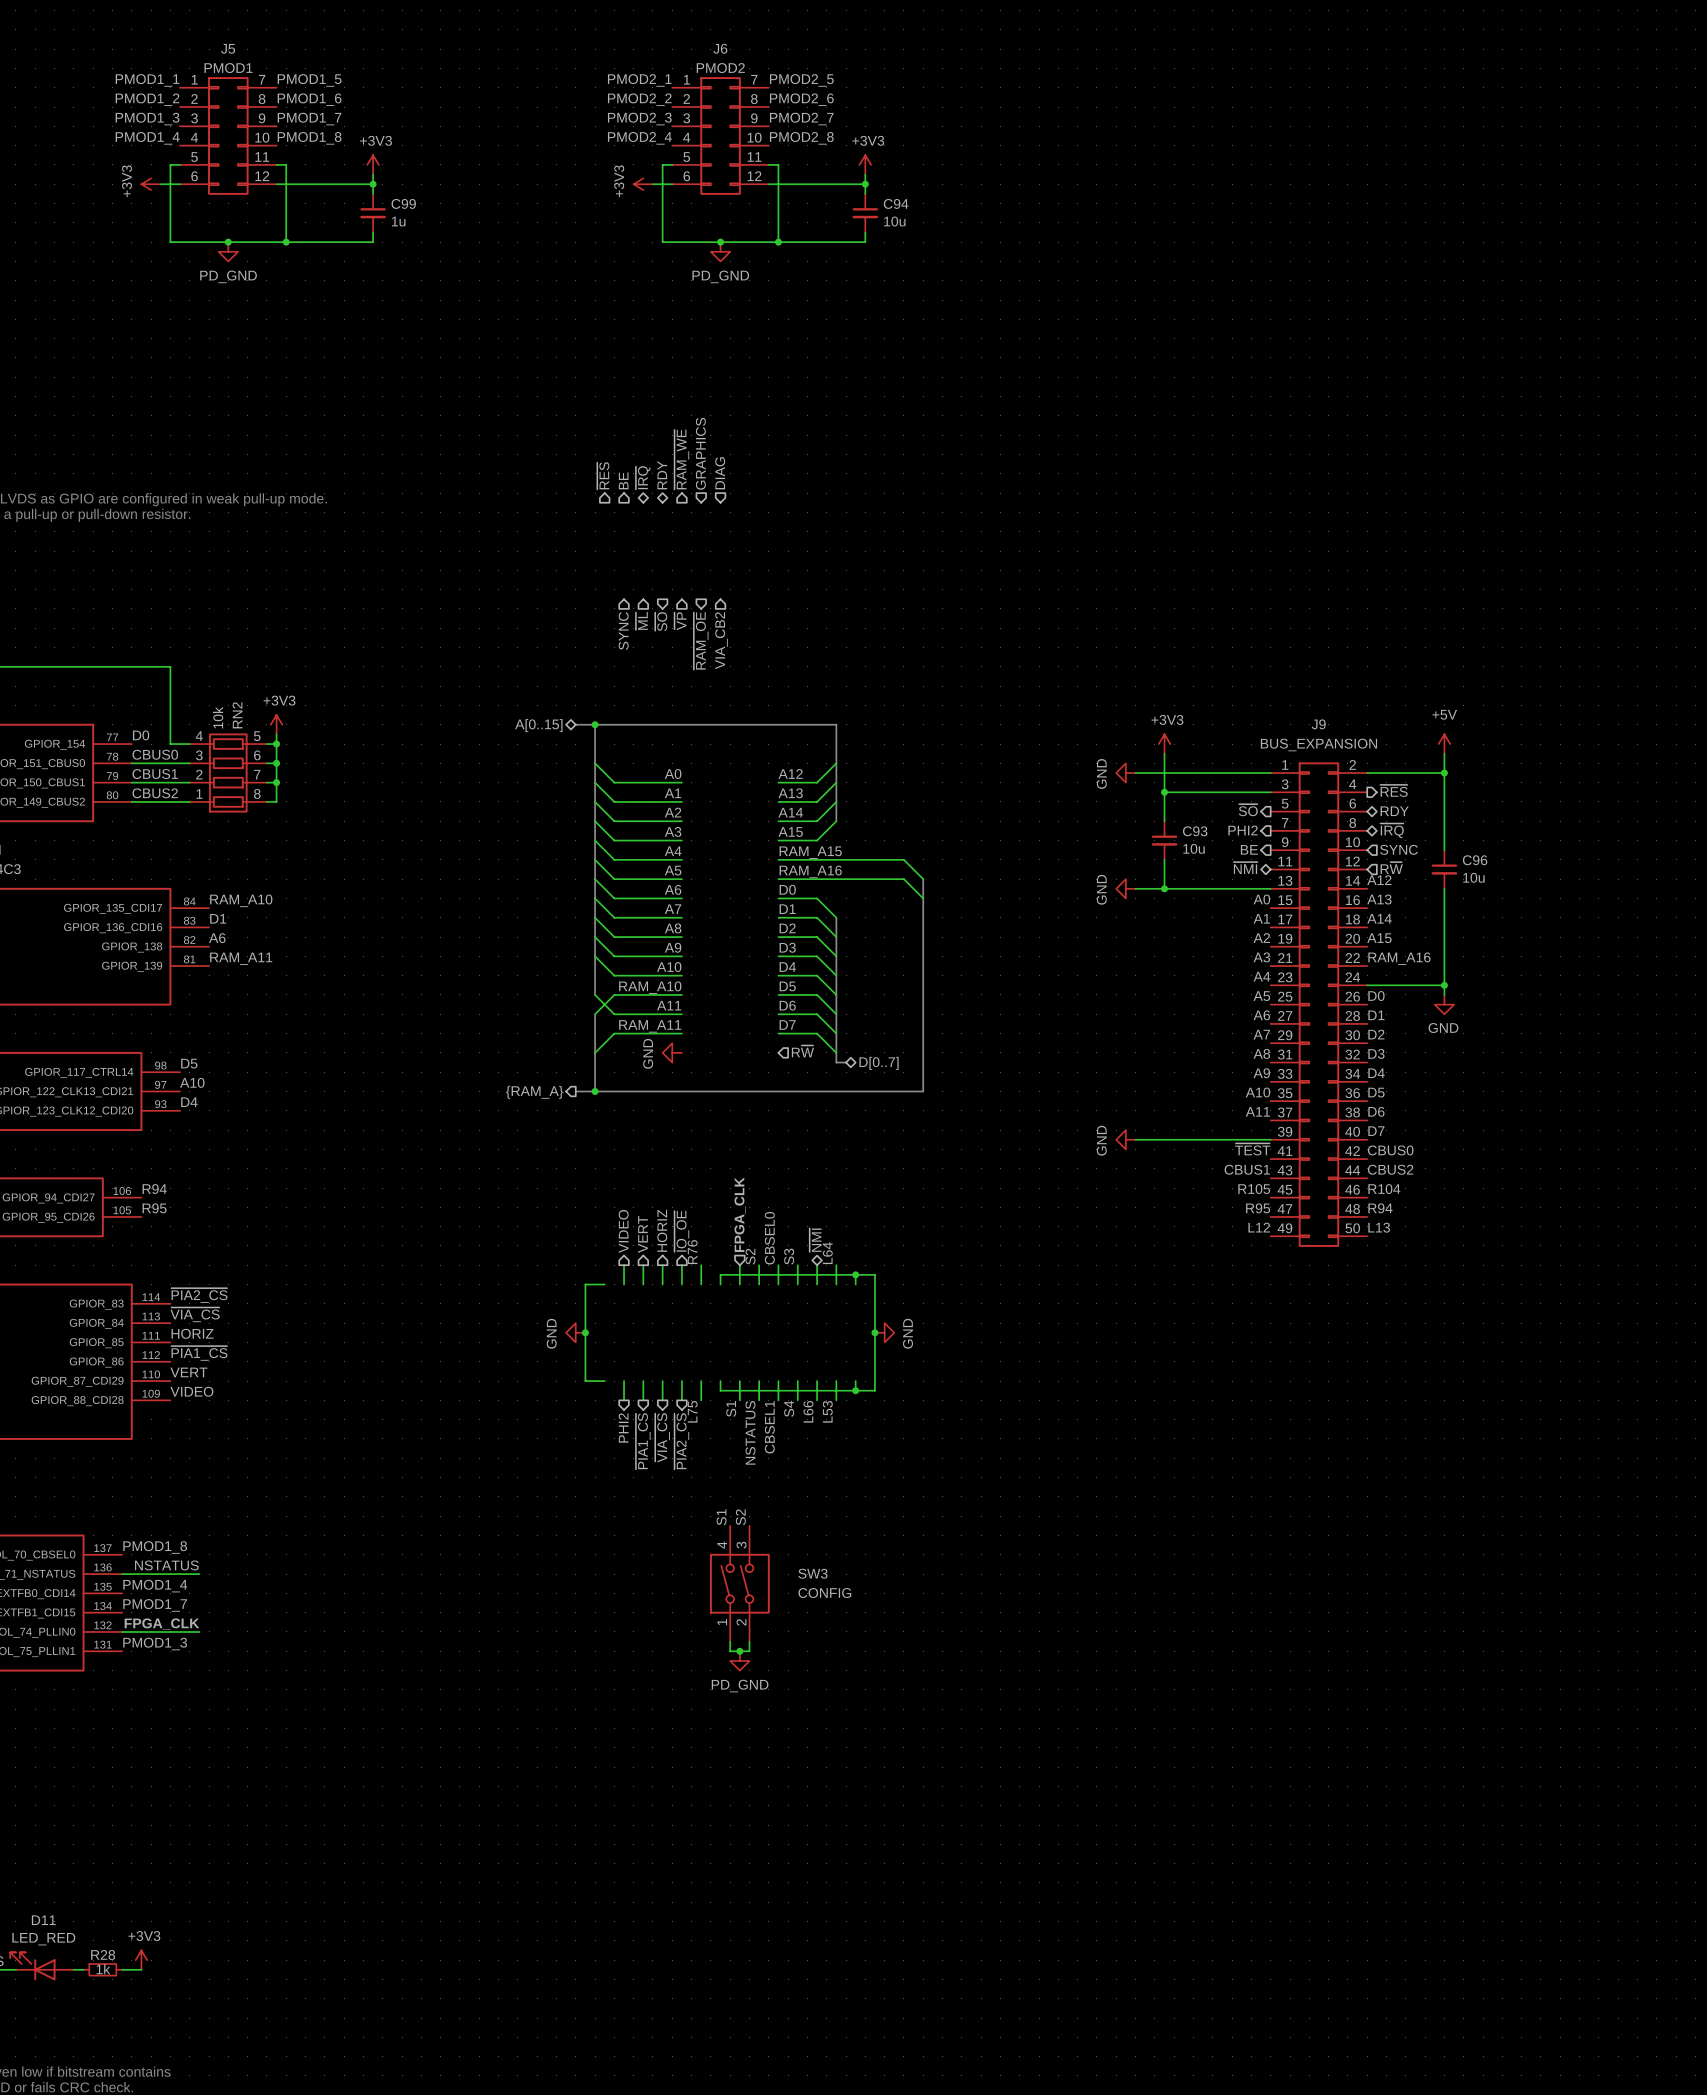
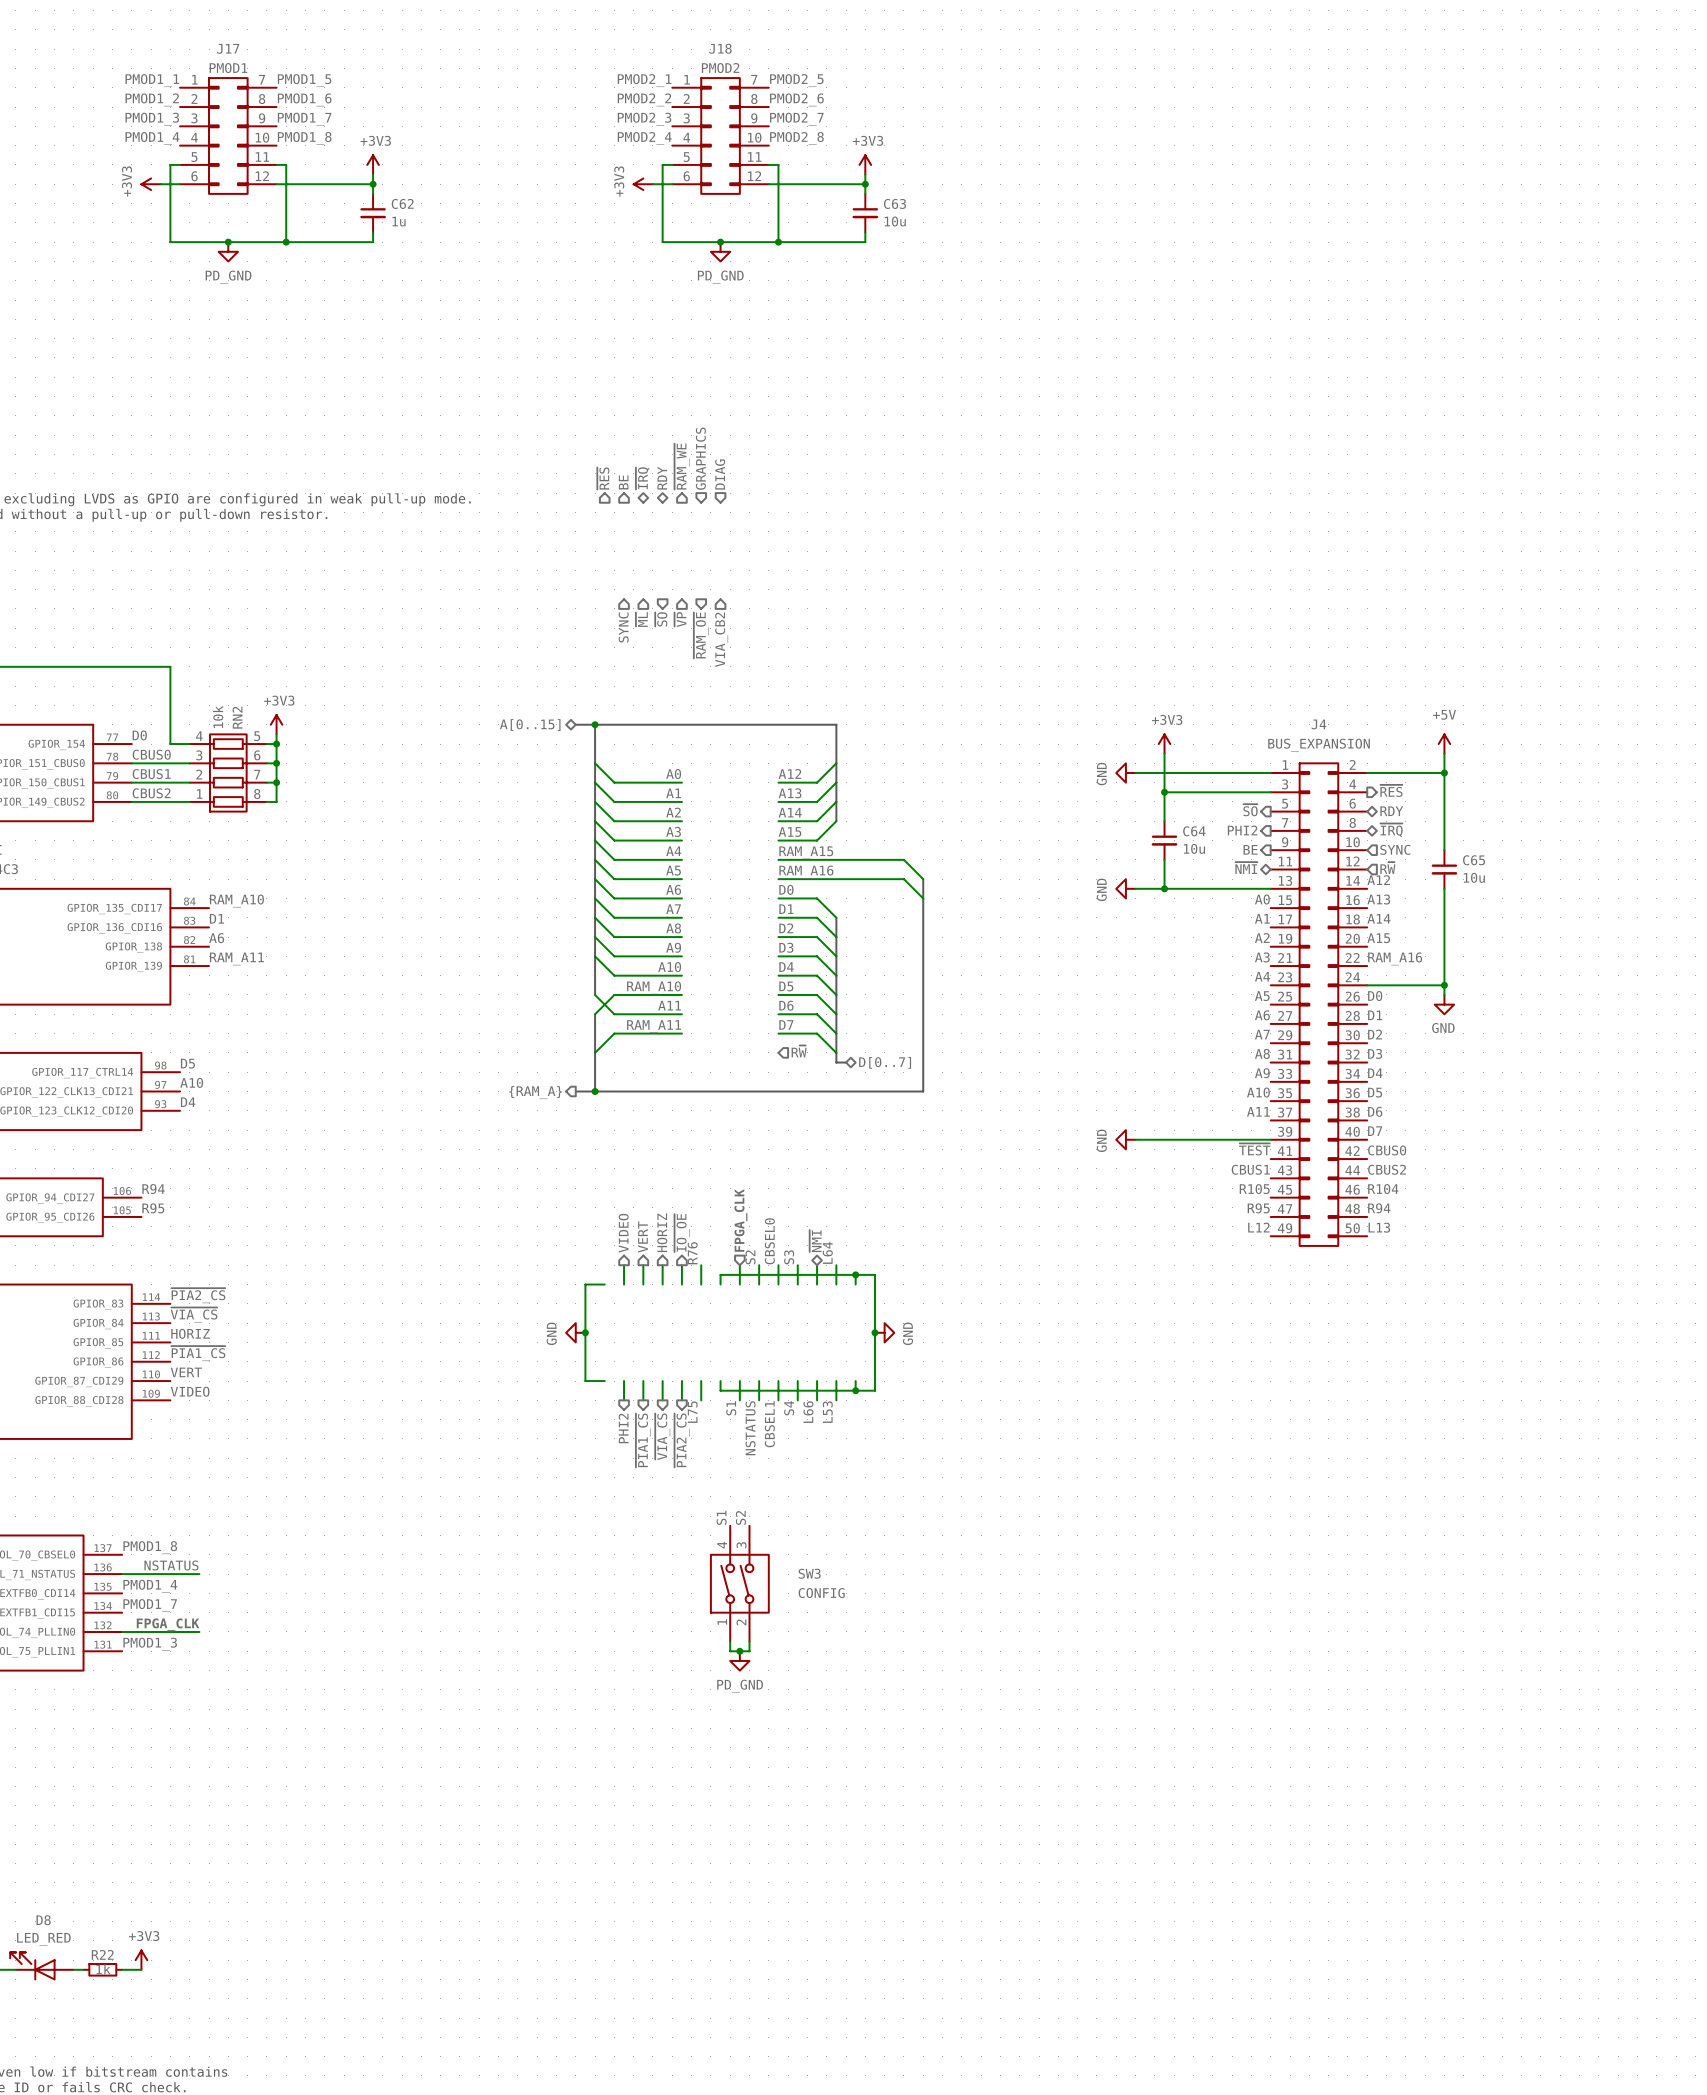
J5 name: J5 (228, 48) -> J17 (228, 48)
J6 name: J6 (720, 48) -> J18 (720, 48)
C99 name: C99 (403, 203) -> C62 (402, 203)
C94 name: C94 (896, 203) -> C63 (894, 203)
J9 name: J9 (1318, 724) -> J4 (1318, 724)
C93 name: C93 (1195, 831) -> C64 (1194, 831)
C96 name: C96 (1475, 860) -> C65 (1474, 860)
power symbol: GND (672, 1052) -> none
D11 name: D11 (43, 1920) -> D8 (43, 1920)
R28 name: R28 (103, 1954) -> R22 (102, 1954)

